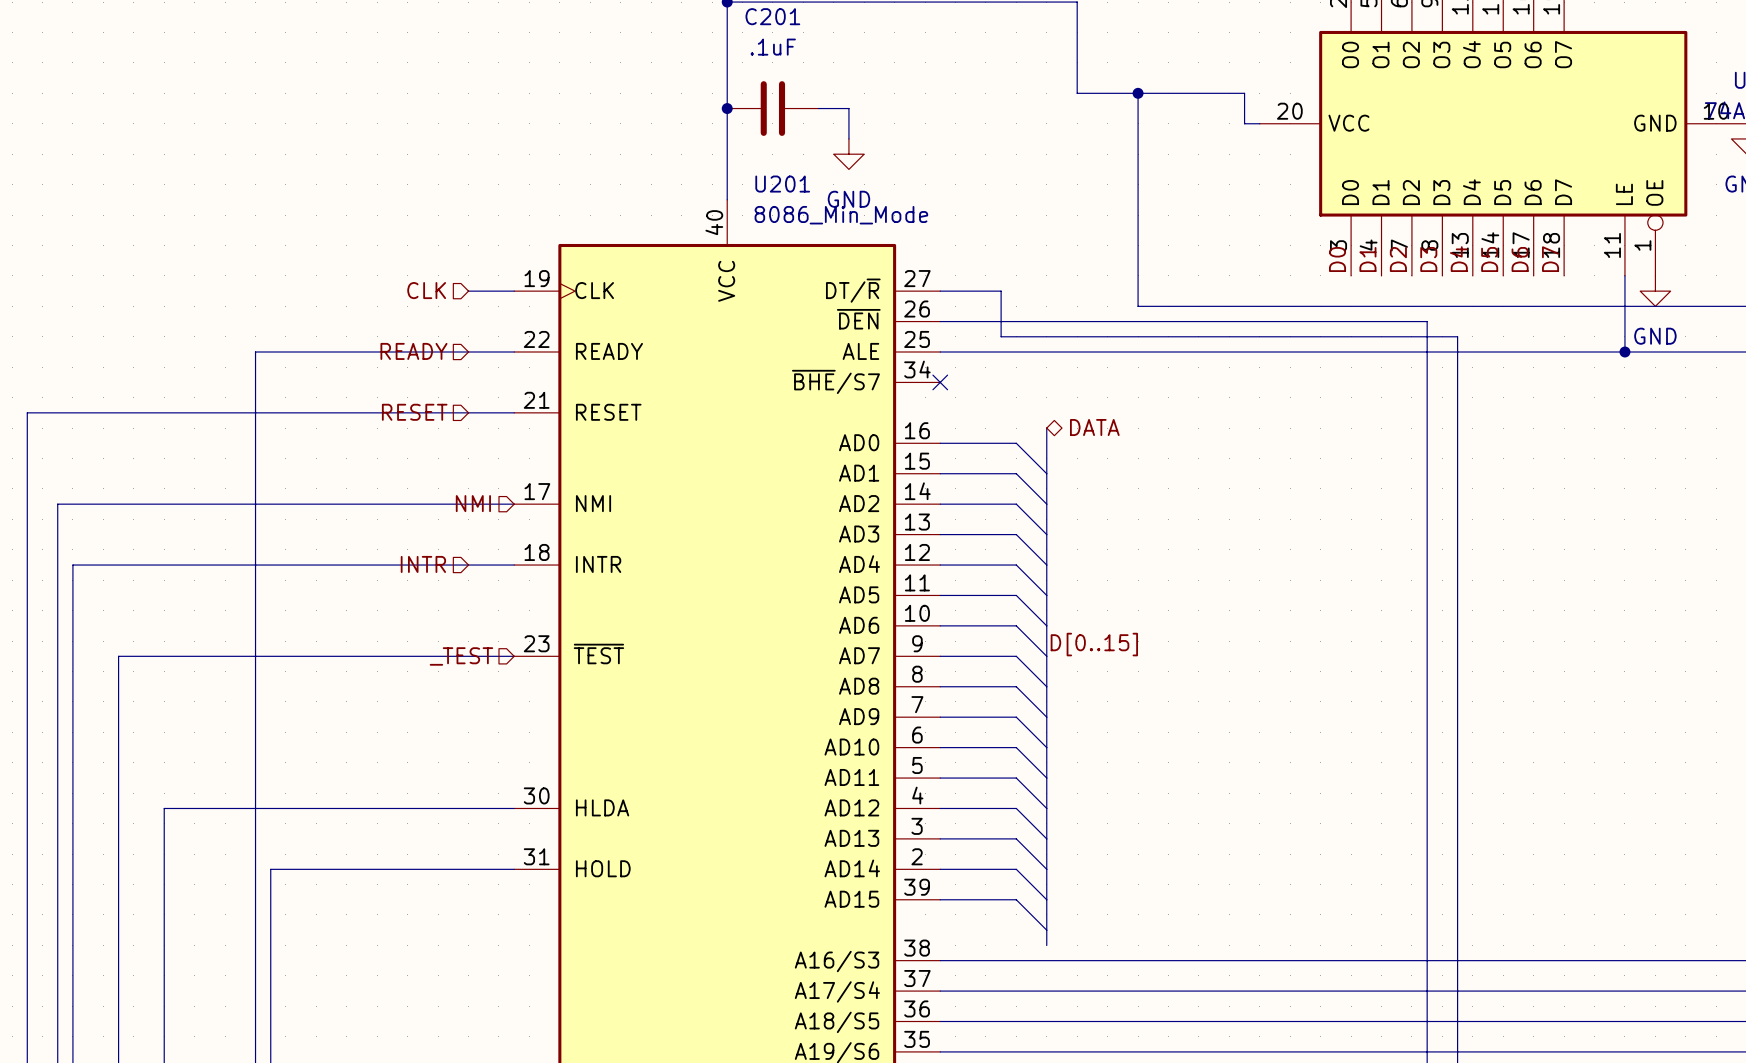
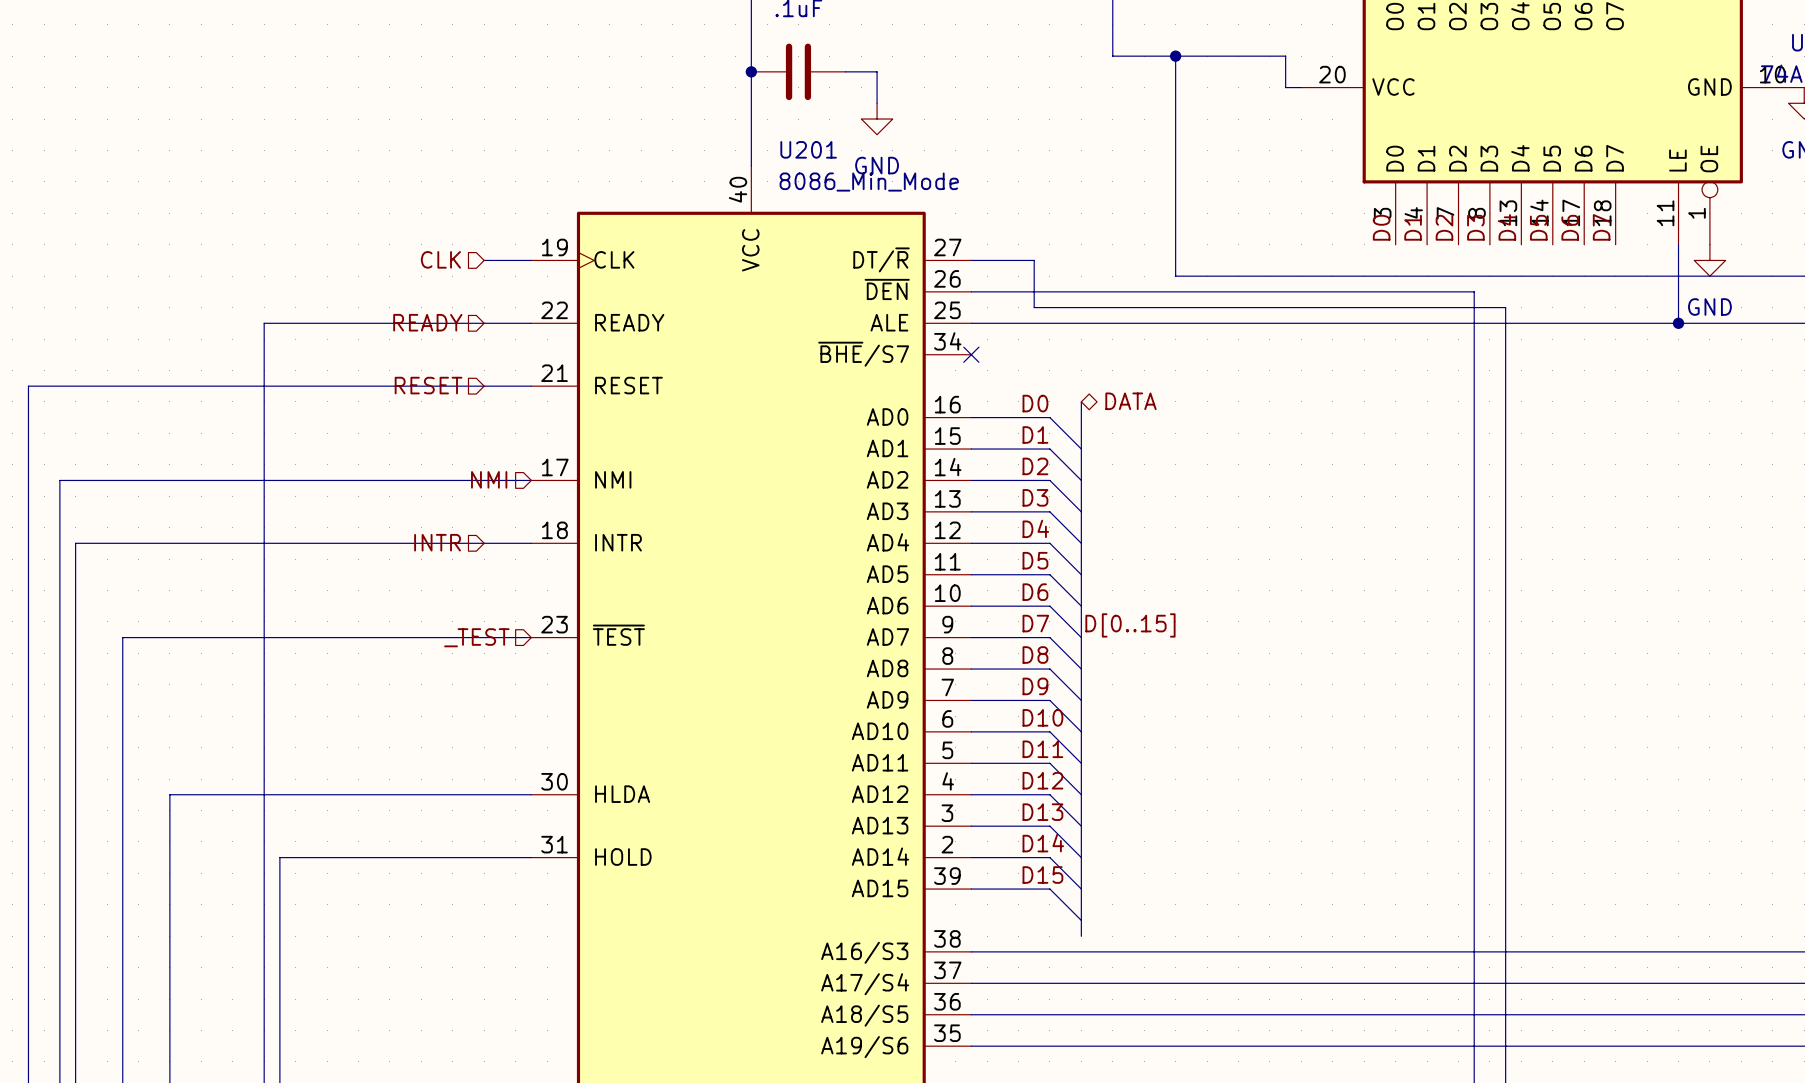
label: none -> D0 (1035, 403)
label: none -> D1 (1035, 434)
label: none -> D2 (1035, 466)
label: none -> D3 (1035, 497)
label: none -> D4 (1035, 528)
label: none -> D5 (1035, 560)
label: none -> D6 (1035, 592)
label: none -> D7 (1035, 623)
label: none -> D8 (1035, 655)
label: none -> D9 (1035, 686)
label: none -> D10 (1042, 717)
label: none -> D11 (1042, 749)
label: none -> D12 (1042, 780)
label: none -> D13 (1042, 812)
label: none -> D14 (1043, 843)
label: none -> D15 (1042, 875)

